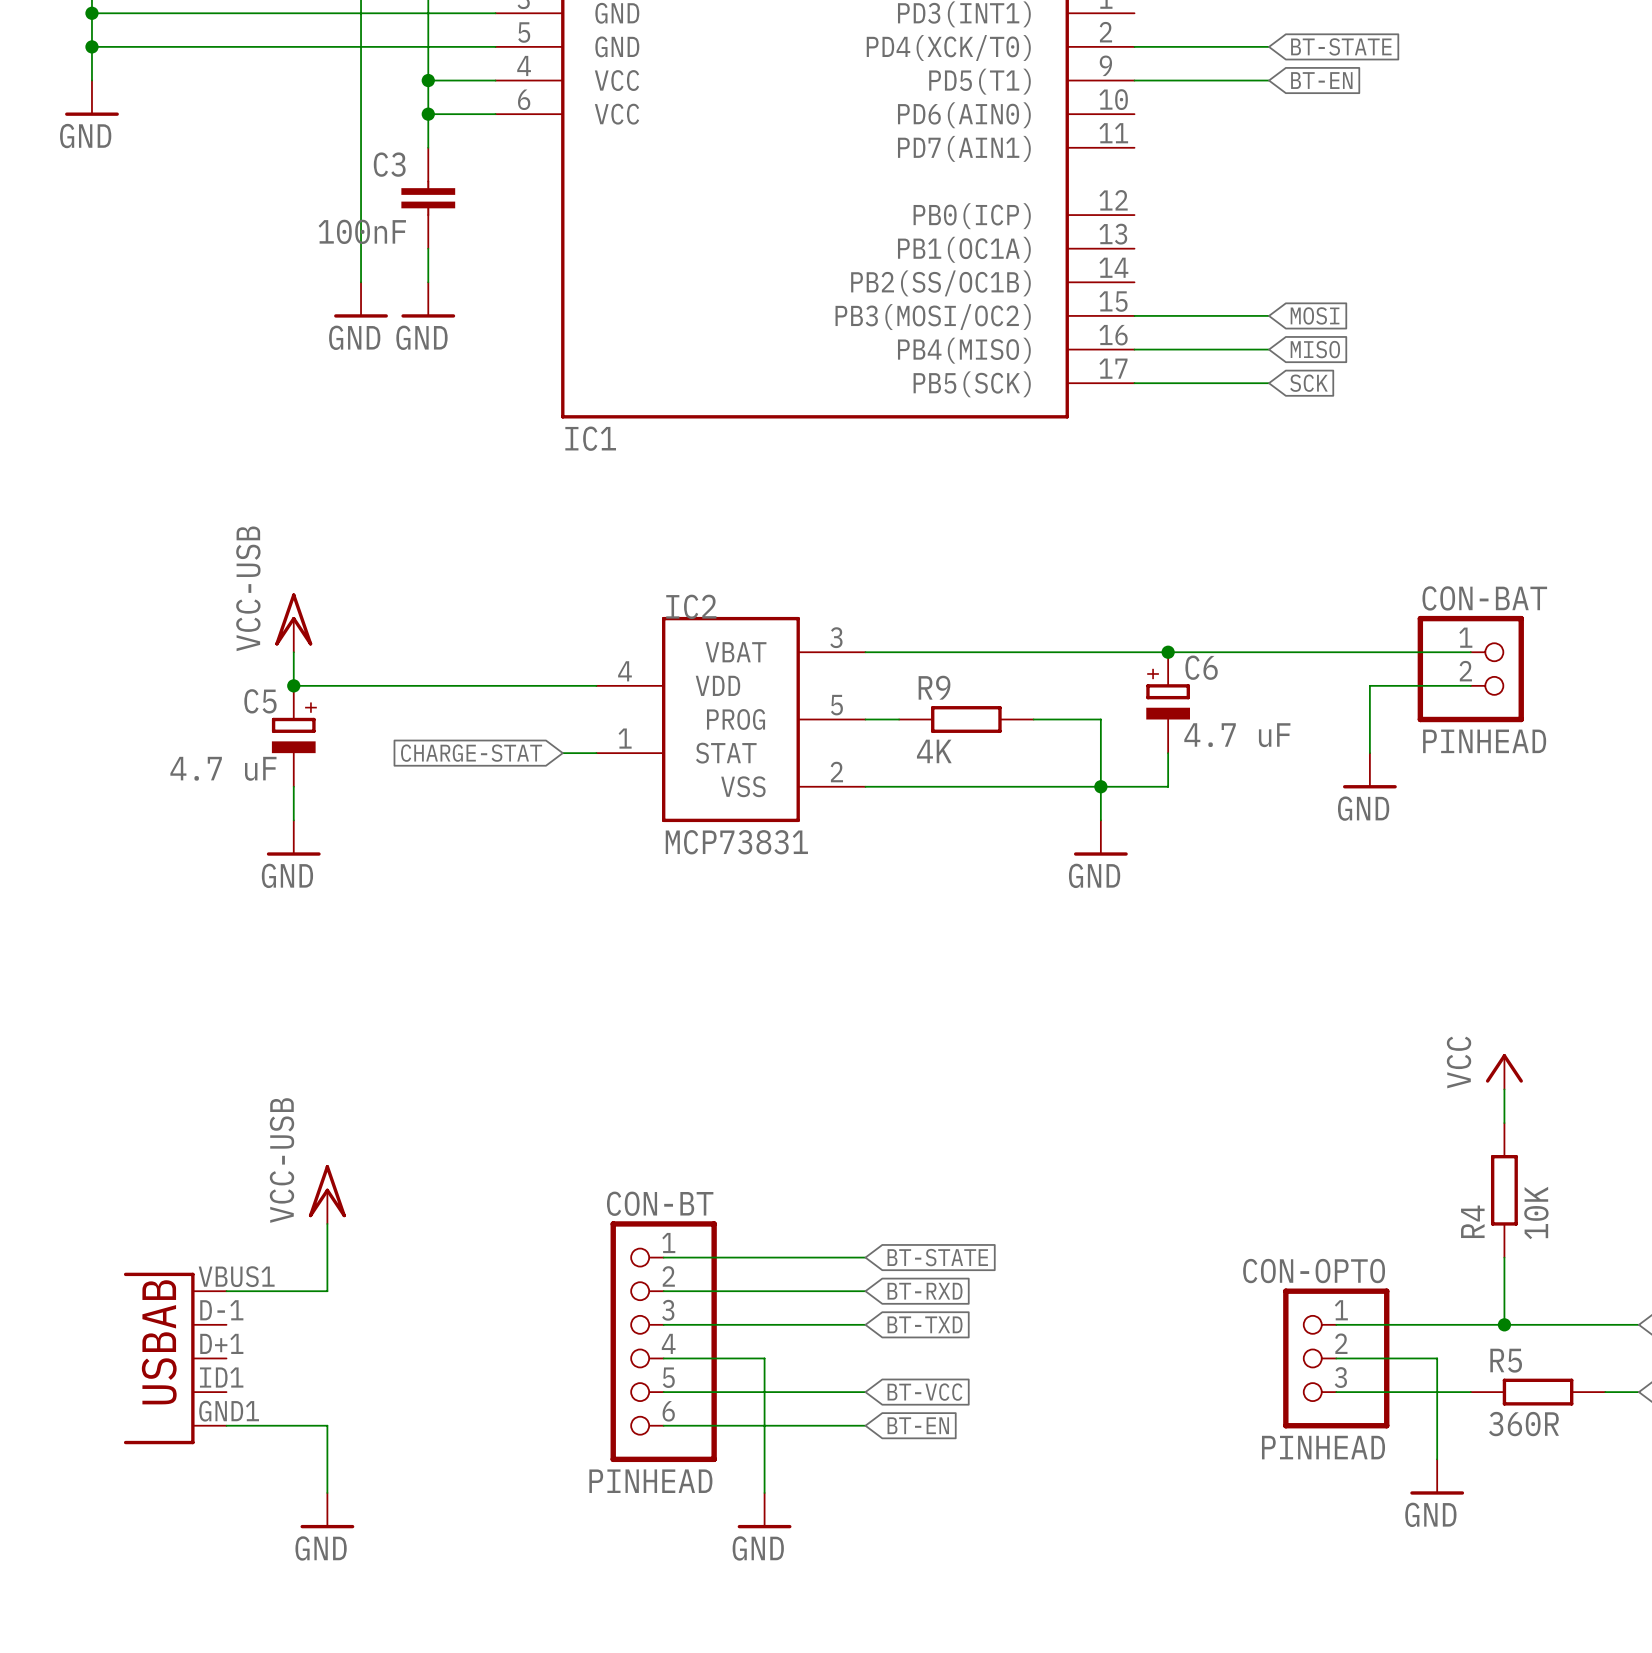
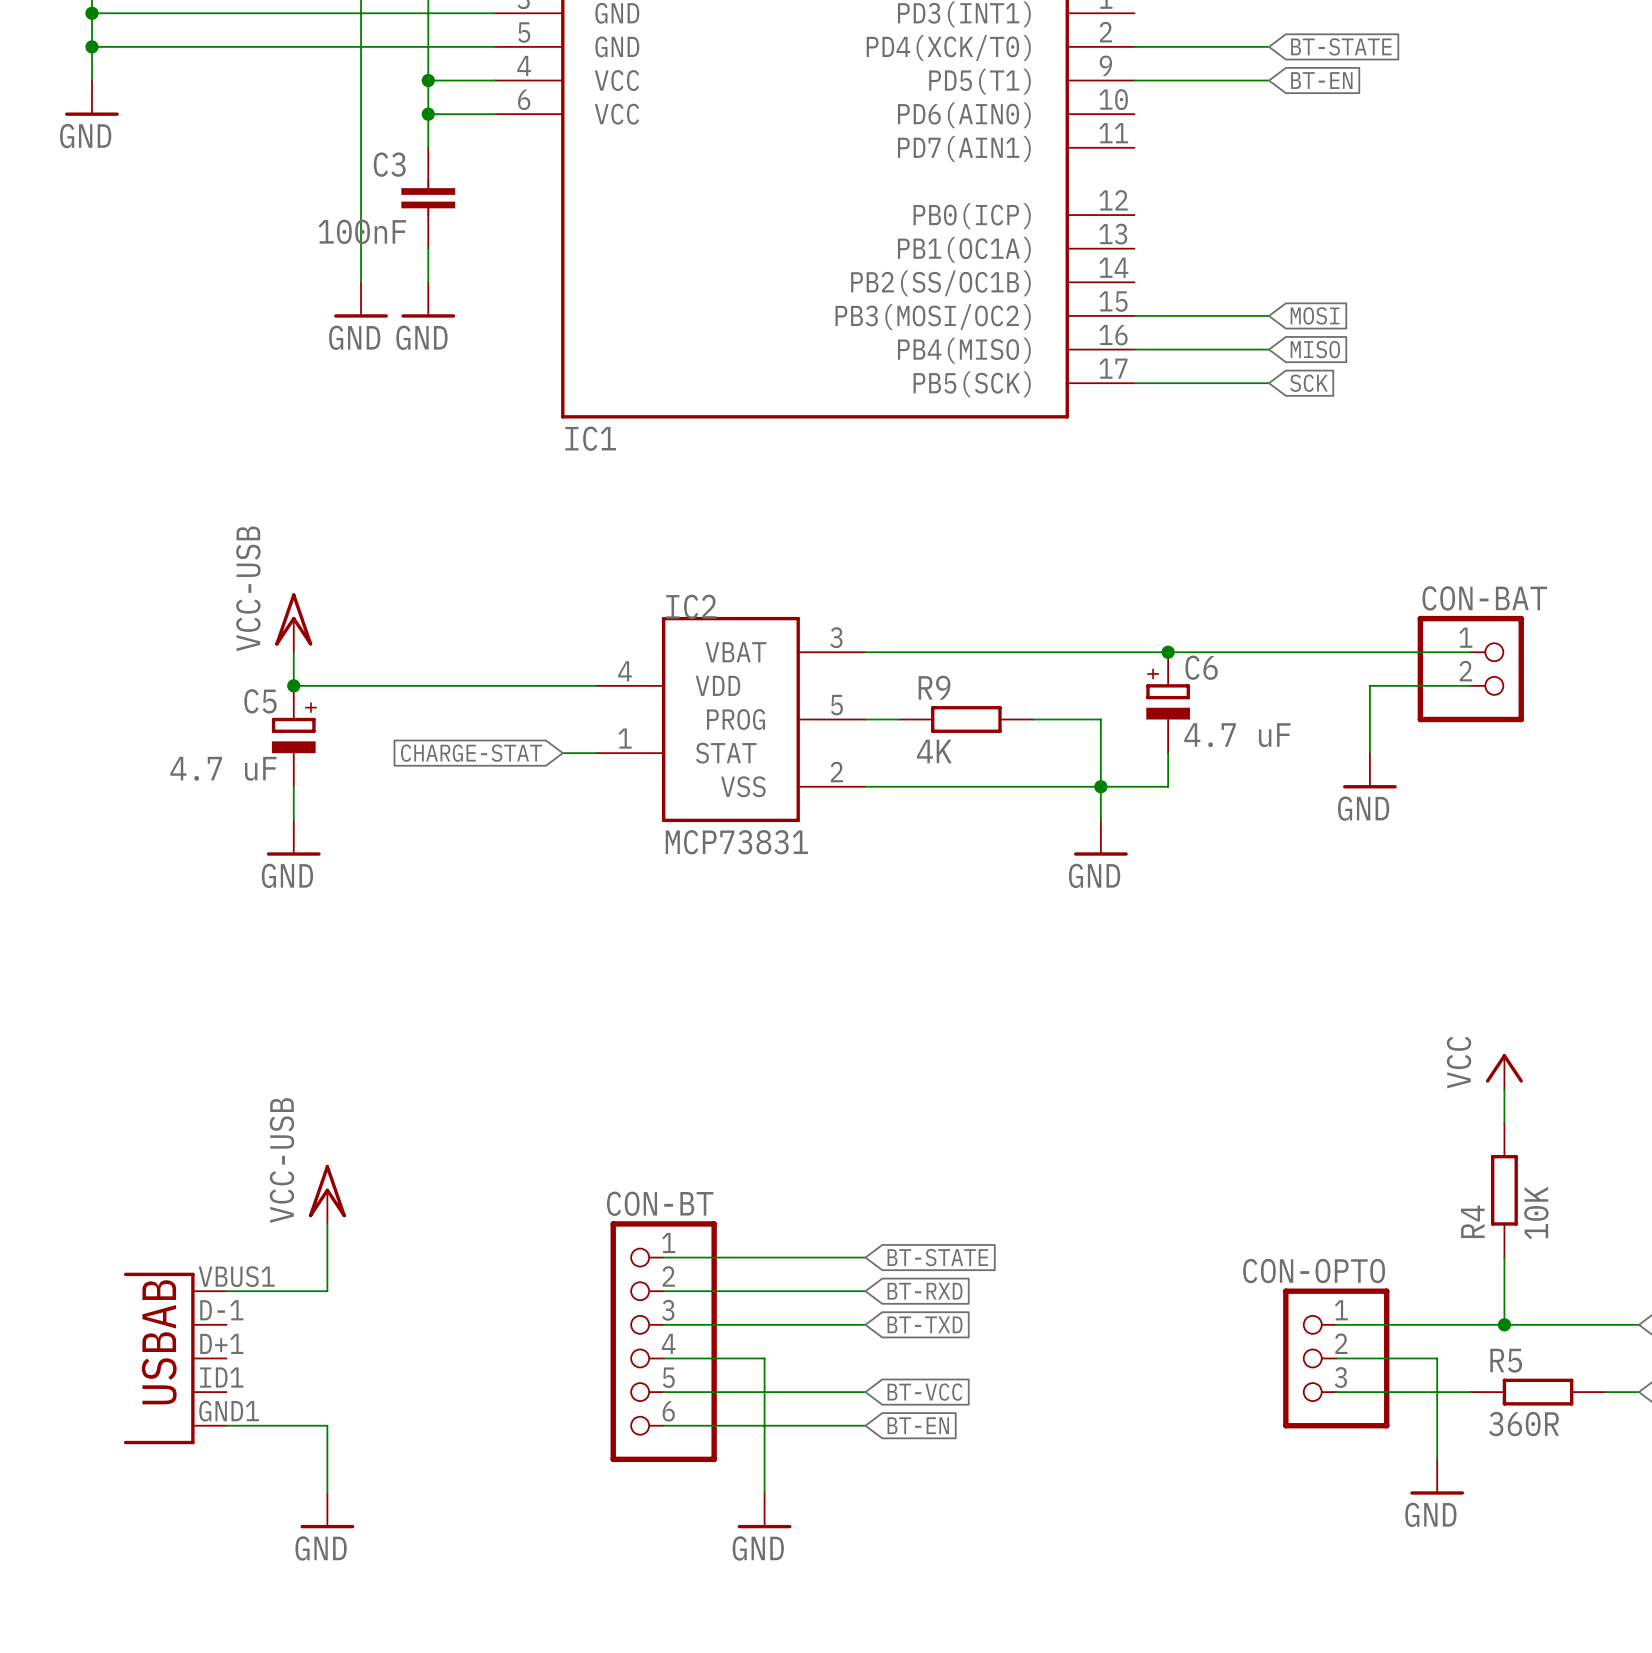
CON-BAT value: PINHEAD (1484, 741) -> none
CON-OPTO value: PINHEAD (1323, 1447) -> none
CON-BT value: PINHEAD (650, 1481) -> none

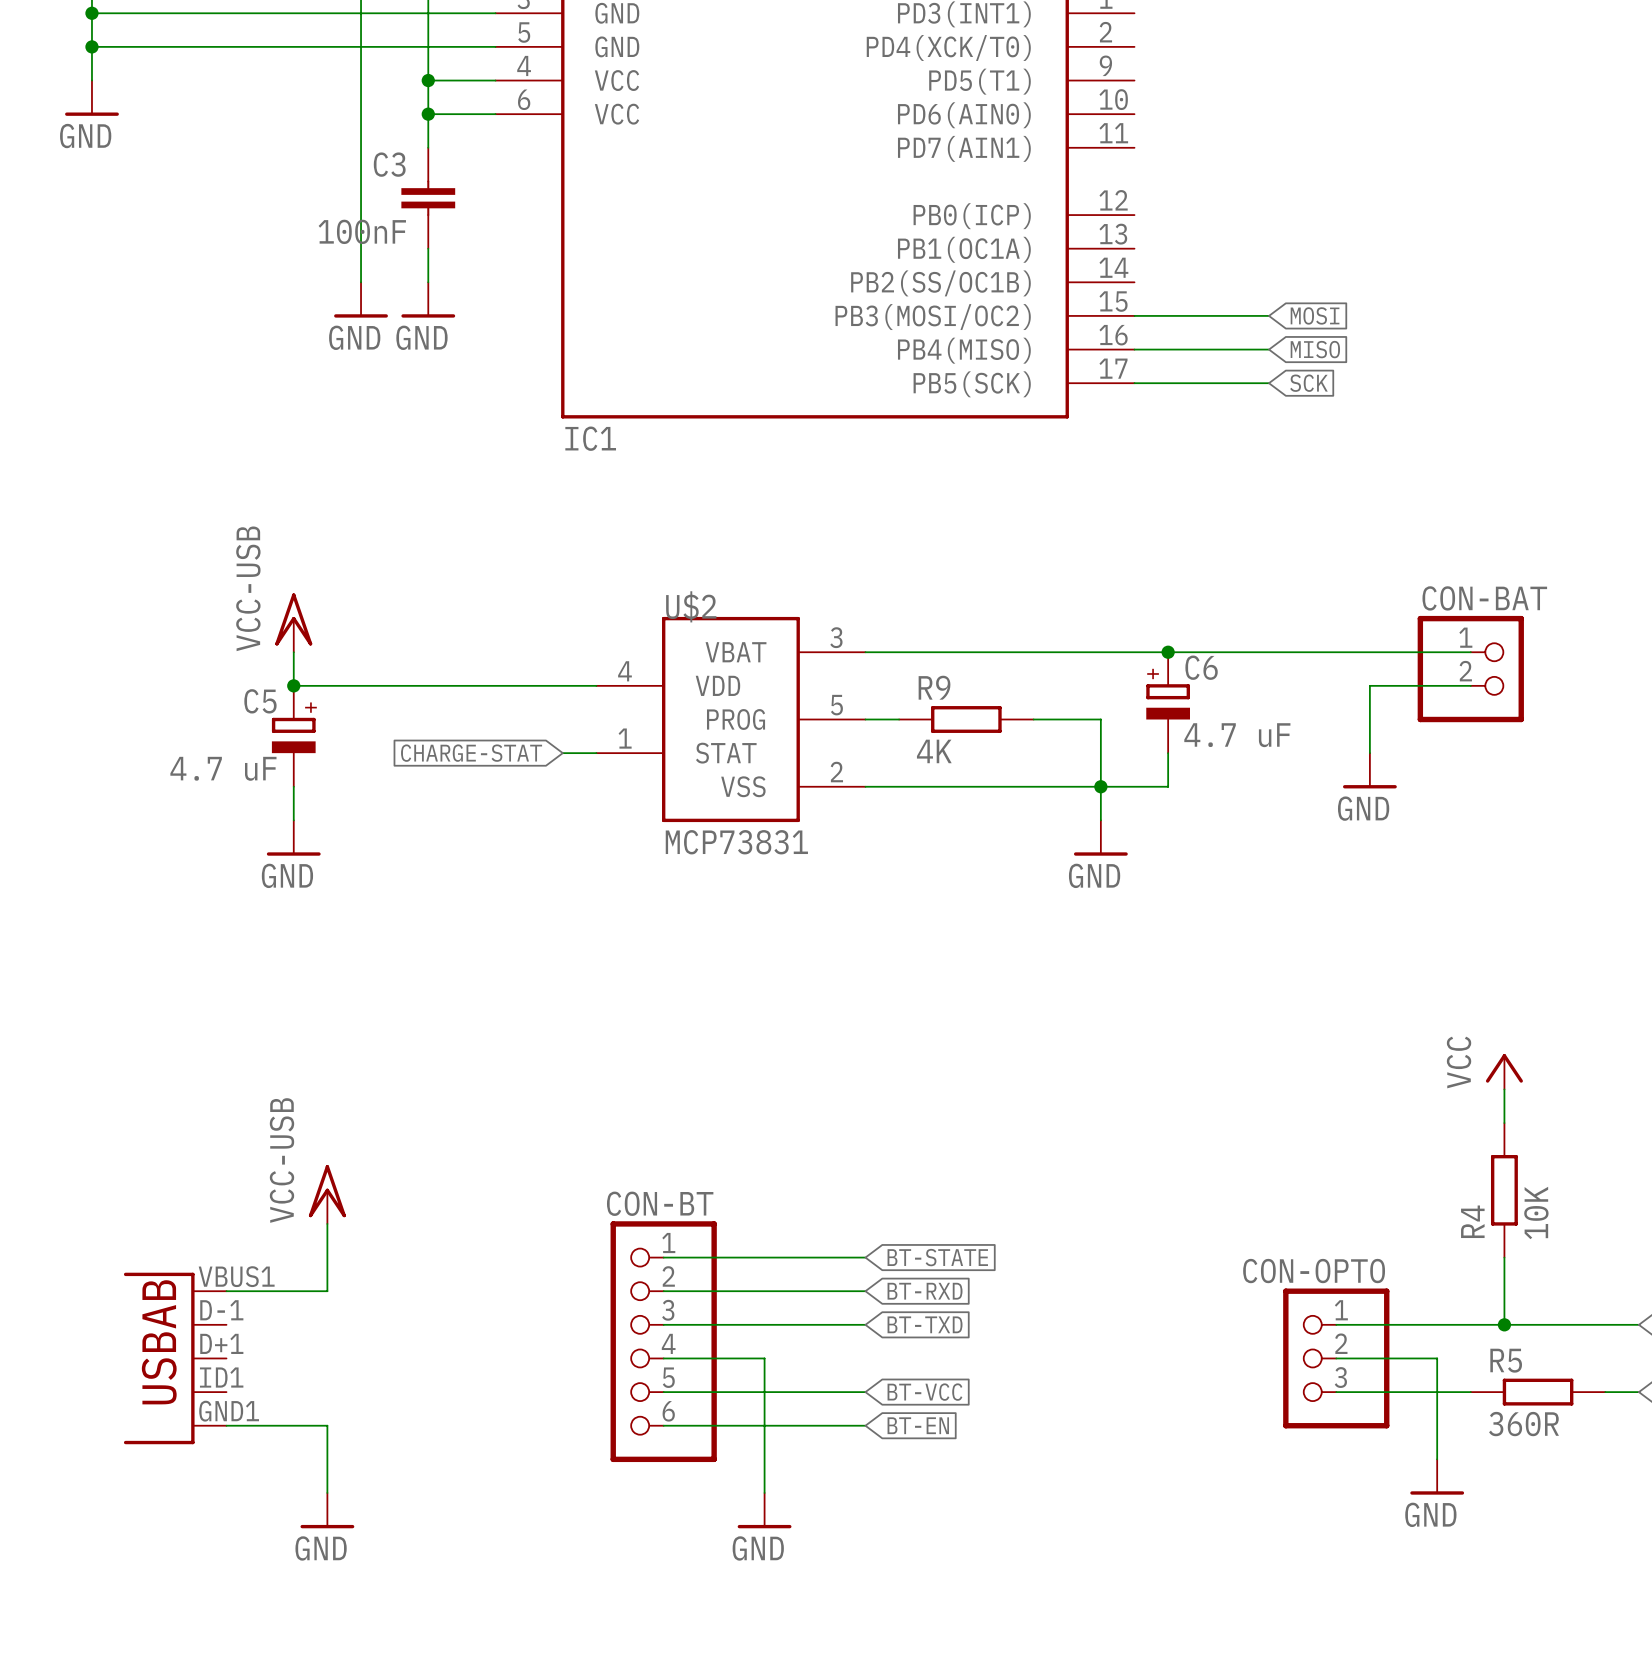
wire: (1134, 46) (1269, 46) -> none
global label: BT-STATE (1341, 46) -> none
wire: (1134, 80) (1269, 80) -> none
global label: BT-EN (1321, 80) -> none
IC2 name: IC2 (691, 606) -> U$2 (691, 606)

